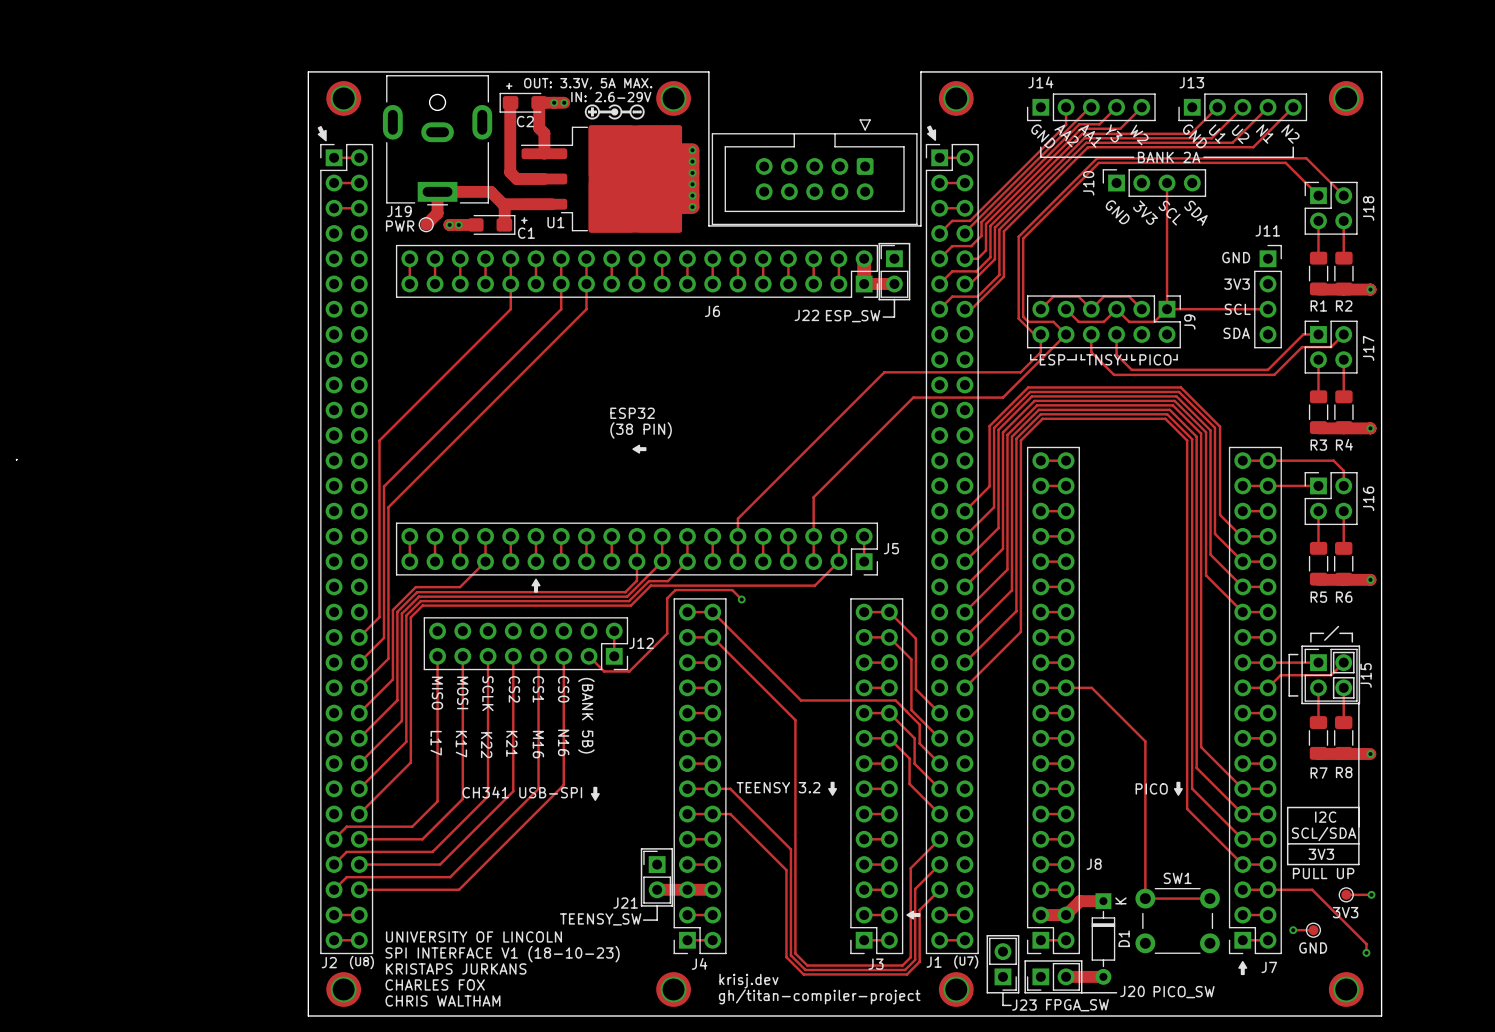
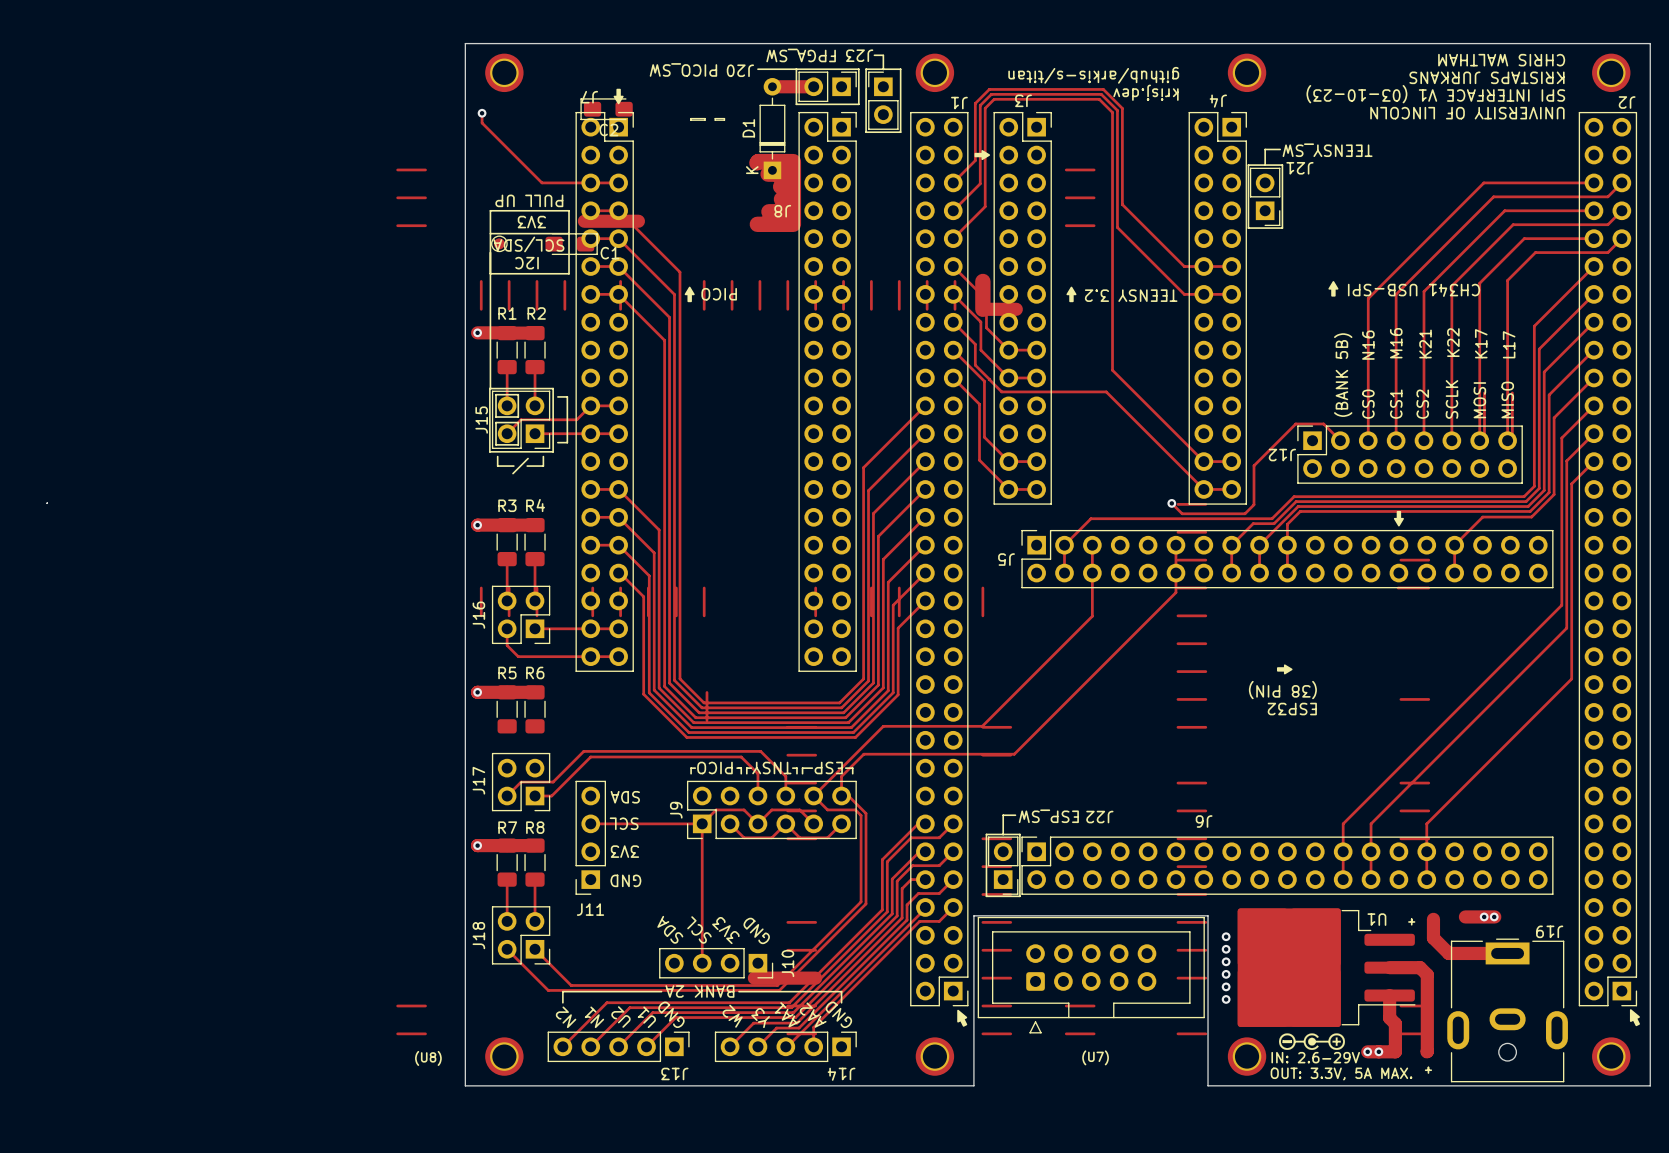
line: none -> (874, 55) (883, 55)
text: none -> FPGA_SW (801, 55)
line: none -> (883, 55) (883, 69)
text: none -> CHRIS WALTHAM (1501, 60)
line: none -> (757, 69) (858, 69) (858, 104) (796, 104) (796, 69)
line: none -> (866, 69) (900, 69) (900, 132) (866, 132) (866, 69)
text: none -> PICO_SW (683, 69)
part: none -> (934, 72)
part: none -> (1247, 72)
board edge: (308, 71) (708, 71) (708, 225) (920, 225) (920, 71) (1381, 71) (1381, 1016) (308, 1016) (308, 71) -> (465, 43) (465, 1085) (973, 1085) (973, 915) (1208, 915) (1208, 1085) (1650, 1085) (1650, 43) (465, 43)
text: none -> github/arkis-s/titan (1093, 75)
text: none -> KRISTAPS JURKANS (1487, 77)
track: none -> (772, 86) (813, 86)
line: (509, 83) (509, 88) -> none
text: OUT: 3.3V, 5A MAX. (588, 83) -> none
drawing: none -> [613, 88, 624, 105]
line: (506, 86) (511, 86) -> none
text: none -> krisj.dev (1145, 92)
text: none -> SPI INTERFACE V1 (03-10-23) (1435, 94)
text: IN: 2.6-29V (611, 97) -> none
part position: (343, 98) -> (504, 72)
part: (673, 98) -> none
part: (956, 98) -> none
part position: (1346, 98) -> (1611, 72)
track: (510, 102) (510, 172) (516, 178) (544, 178) -> none
via: (554, 102) -> none
track: (564, 102) (539, 102) (539, 128) (544, 133) (544, 153) -> none
via: (564, 102) -> none
drawing: [584, 104, 645, 120] -> none
track: none -> (482, 113) (482, 123) (541, 182) (618, 182)
via: none -> (482, 113)
text: none -> UNIVERSITY OF LINCOLN (1467, 113)
track: (1066, 107) (1066, 124) (970, 220) (952, 220) (939, 233) -> none
track: (1091, 107) (964, 233) -> none
J14 rotation: 0° (1091, 107) -> 180° (785, 1046)
J14 position: (1091, 107) -> (785, 1046)
track: (1116, 107) (1099, 124) (1079, 124) (981, 222) (981, 235) (971, 246) (952, 246) (939, 258) -> none
track: (1141, 107) (1120, 128) (1081, 128) (985, 223) (985, 250) (977, 258) (964, 258) -> none
track: (1217, 107) (1191, 133) (1082, 133) (990, 225) (990, 257) (976, 271) (952, 271) (939, 283) -> none
track: (1242, 107) (1211, 138) (1084, 138) (994, 227) (994, 259) (970, 283) (964, 283) -> none
J13 rotation: 0° (1242, 107) -> 180° (618, 1046)
J13 position: (1242, 107) -> (618, 1046)
track: (1268, 107) (1232, 142) (1086, 142) (999, 229) (999, 274) (977, 296) (952, 296) (939, 309) -> none
track: (1293, 107) (1253, 147) (1088, 147) (1003, 231) (1003, 276) (971, 309) (964, 309) -> none
line: (591, 108) (591, 115) (593, 115) (593, 108) (591, 108) -> none
line: (588, 111) (596, 111) (596, 112) (588, 112) (588, 111) -> none
line: (633, 111) (640, 111) (640, 112) (633, 112) (633, 111) -> none
drawing: [317, 125, 327, 142] -> none
drawing: [927, 125, 937, 141] -> none
text: Y3 (1114, 133) -> none
text: U1 (1217, 134) -> none
text: U2 (1240, 134) -> none
text: N1 (1264, 134) -> none
text: N2 (1290, 134) -> none
text: W2 (1139, 135) -> none
text: GND (1043, 136) -> none
text: AA2 (1066, 136) -> none
text: AA1 (1089, 136) -> none
text: GND (1194, 136) -> none
drawing: none -> [974, 150, 991, 161]
line: none -> (1280, 149) (1265, 149) (1265, 165)
text: none -> TEENSY_SW (1327, 150)
J19 rotation: 0° (437, 140) -> 180° (1507, 1010)
J19 position: (437, 140) -> (1507, 1010)
line: (1040, 147) (1040, 157) (1133, 157) -> none
line: (1293, 147) (1293, 157) (1203, 157) -> none
via: (692, 150) -> none
line: none -> (1248, 165) (1248, 228) (1282, 228) (1282, 165) (1248, 165)
text: BANK 2A (1169, 157) -> none
via: (692, 161) -> none
track: none -> (953, 182) (975, 160) (975, 103) (989, 89) (1103, 89) (1122, 108) (1122, 204) (1184, 266) (1231, 266)
track: none -> (1593, 182) (1483, 182) (1368, 298) (1368, 440)
track: none -> (1621, 182) (1607, 196) (1493, 196) (1396, 294) (1396, 440)
via: (692, 172) -> none
part: (814, 172) -> none
U1 rotation: 0° (601, 178) -> 180° (1326, 967)
U1 position: (601, 178) -> (1326, 967)
J10 rotation: 0° (1154, 183) -> 180° (716, 963)
J10 position: (1154, 183) -> (716, 963)
track: (1167, 183) (1167, 309) -> none
via: (692, 184) -> none
text: none -> PULL UP (529, 200)
track: none -> (590, 210) (618, 210) (680, 272) (680, 678) (704, 702) (839, 702) (863, 678) (863, 467) (925, 405)
track: none -> (953, 210) (980, 183) (980, 105) (991, 94) (1101, 94) (1117, 110) (1117, 227) (1184, 294) (1231, 294)
track: none -> (1593, 210) (1504, 210) (1423, 291) (1423, 440)
track: none -> (1621, 210) (1607, 224) (1513, 224) (1451, 286) (1451, 440)
via: (692, 195) -> none
track: (1318, 195) (1285, 162) (1098, 162) (1023, 238) (1023, 316) (1028, 321) (1053, 321) (1066, 334) (1002, 397) (913, 397) (813, 497) (813, 561) -> none
track: (1343, 195) (1306, 158) (1097, 158) (1018, 236) (1018, 318) (1034, 334) (1040, 334) (1040, 352) (1020, 372) (884, 372) (737, 518) (737, 561) -> none
text: none -> 3V3 (531, 222)
via: (692, 207) -> none
J18 rotation: 0° (1331, 208) -> 180° (521, 935)
J18 position: (1331, 208) -> (521, 935)
text: GND (1117, 212) -> none
text: 3V3 (1145, 212) -> none
text: SCL (1169, 213) -> none
text: SDA (1195, 213) -> none
line: none -> (490, 233) (569, 233)
line: (524, 217) (524, 222) -> none
track: none -> (590, 238) (618, 238) (674, 294) (674, 680) (701, 707) (841, 707) (868, 680) (868, 490) (925, 433)
line: (521, 220) (526, 220) -> none
track: none -> (953, 238) (985, 206) (985, 108) (994, 99) (1099, 99) (1112, 112) (1112, 370) (1203, 461) (1231, 461)
track: (1318, 220) (1318, 258) -> none
track: (1343, 220) (1343, 258) -> none
track: none -> (1593, 238) (1524, 238) (1479, 283) (1479, 440)
track: none -> (1621, 238) (1607, 252) (1535, 252) (1507, 280) (1507, 440)
track: (504, 222) (504, 205) (490, 191) (437, 191) (437, 213) (426, 224) -> none
track: (449, 224) (475, 224) -> none
via: (449, 224) -> none
via: (458, 224) -> none
text: none -> SCL/SDA (528, 244)
text: PWR (400, 226) -> none
text: none -> I2C (527, 263)
line: (879, 243) (879, 299) (909, 299) (909, 243) (879, 243) -> none
track: none -> (590, 266) (618, 266) (669, 317) (669, 683) (699, 712) (843, 712) (873, 683) (873, 513) (925, 461)
track: none -> (953, 266) (986, 299) (986, 327) (1008, 350) (1036, 350)
track: none -> (1593, 266) (1534, 326) (1534, 486) (1524, 496) (1294, 496) (1272, 518) (1090, 518) (1064, 545) (1064, 573)
line: none -> (490, 273) (569, 273) (569, 210) (490, 210) (490, 389)
text: GND (1236, 257) -> none
track: (510, 258) (510, 309) (379, 440) (379, 617) (359, 637) -> none
track: (561, 258) (561, 309) (383, 486) (383, 637) (359, 662) -> none
track: (586, 258) (586, 309) (388, 507) (388, 658) (359, 687) -> none
drawing: none -> [1328, 281, 1339, 297]
drawing: none -> [684, 286, 695, 303]
drawing: none -> [1066, 286, 1077, 303]
text: none -> CH341 USB-SPI (1414, 290)
track: none -> (590, 294) (618, 294) (664, 340) (664, 686) (695, 717) (845, 717) (878, 685) (878, 536) (925, 489)
text: none -> PICO (719, 294)
track: none -> (953, 294) (980, 322) (980, 350) (1008, 377) (1036, 377)
track: none -> (1593, 294) (1539, 349) (1539, 488) (1526, 501) (1296, 501) (1274, 523) (1253, 523) (1231, 545) (1231, 573)
J6 rotation: 0° (636, 271) -> 180° (1287, 865)
J6 position: (636, 271) -> (1287, 865)
J22 rotation: 0° (894, 271) -> 180° (1003, 865)
J22 position: (894, 271) -> (1003, 865)
text: none -> TEENSY 3.2 (1131, 295)
R1 position: (1318, 273) -> (507, 350)
R2 position: (1343, 273) -> (535, 350)
text: 3V3 (1237, 284) -> none
track: (1318, 289) (1370, 289) -> none
via: (1370, 289) -> none
track: none -> (953, 322) (975, 344) (975, 365) (1001, 391) (1106, 391) (1203, 489) (1231, 489)
track: none -> (1593, 322) (1544, 372) (1544, 490) (1528, 506) (1298, 506) (1259, 545) (1259, 573)
J11 rotation: 0° (1268, 296) -> 180° (590, 837)
J11 position: (1268, 296) -> (590, 837)
line: (894, 299) (894, 317) (883, 317) -> none
track: none -> (477, 332) (535, 333)
via: none -> (477, 332)
R1 name position: R1 (1318, 305) -> R1 (507, 313)
R2 name position: R2 (1344, 305) -> R2 (536, 313)
track: (1040, 309) (1053, 296) (1078, 296) (1091, 309) (1103, 296) (1129, 296) (1141, 309) -> none
track: (1066, 309) (1078, 321) (1103, 321) (1116, 309) (1129, 321) (1154, 321) (1167, 309) -> none
track: (1167, 309) (1268, 309) -> none
text: SCL (1237, 309) -> none
text: none -> M16 (1396, 343)
text: none -> K22 (1453, 342)
text: none -> K21 (1425, 343)
text: none -> K17 (1481, 343)
text: ESP_SW (853, 316) -> none
text: none -> L17 (1509, 344)
track: none -> (953, 350) (984, 381) (984, 437) (1008, 461) (1036, 461)
track: none -> (1593, 350) (1549, 394) (1549, 492) (1530, 511) (1300, 511) (1287, 524) (1287, 573)
J9 rotation: 0° (1103, 321) -> 180° (771, 809)
J9 position: (1103, 321) -> (771, 809)
text: SDA (1236, 333) -> N16 (1368, 345)
track: (1091, 334) (1091, 352) (1114, 374) (1274, 374) (1302, 347) (1331, 347) (1343, 334) -> none
track: (1116, 334) (1116, 354) (1131, 369) (1268, 369) (1303, 334) (1318, 334) -> none
track: none -> (507, 367) (507, 405)
track: none -> (535, 367) (535, 405)
text: none -> (BANK 5B) (1343, 375)
track: none -> (953, 377) (979, 404) (979, 460) (1008, 489) (1036, 489)
track: none -> (1593, 377) (1554, 417) (1554, 494) (1531, 517) (1482, 517) (1454, 545) (1454, 573)
J17 rotation: 0° (1331, 347) -> 180° (521, 782)
J17 position: (1331, 347) -> (521, 782)
line: (1030, 354) (1030, 359) (1037, 359) -> none
line: (1076, 354) (1076, 359) (1067, 359) -> none
line: (1081, 354) (1081, 359) (1085, 359) -> none
line: (1126, 354) (1126, 359) (1122, 359) -> none
line: (1131, 354) (1131, 359) (1135, 359) -> none
line: (1177, 354) (1177, 359) (1173, 359) -> none
line: none -> (489, 388) (553, 388) (553, 451) (489, 451) (489, 388)
text: ESP (1052, 359) -> none
text: TNSY (1103, 359) -> none
text: PICO (1155, 359) -> none
line: none -> (496, 394) (518, 394) (518, 417) (496, 417) (496, 394)
line: none -> (557, 396) (567, 396) (567, 442) (557, 442)
text: none -> SCLK (1452, 399)
text: none -> MOSI (1479, 400)
text: none -> MISO (1507, 399)
text: none -> CS0 (1368, 404)
text: none -> CS1 (1396, 404)
text: none -> CS2 (1422, 404)
track: none -> (618, 405) (590, 405) (576, 419) (521, 419) (507, 433)
track: none -> (1593, 405) (1561, 438) (1561, 605) (1343, 823) (1343, 879)
line: none -> (496, 422) (496, 444) (518, 444) (518, 422) (496, 422)
track: none -> (535, 433) (618, 433)
track: none -> (1593, 433) (1566, 460) (1566, 628) (1371, 823) (1371, 879)
track: none -> (1340, 440) (1323, 423) (1295, 423) (1254, 465) (1254, 504) (1245, 513) (1182, 513) (1171, 503)
R3 position: (1318, 412) -> (507, 542)
R4 position: (1343, 412) -> (535, 542)
text: ESP32 (632, 413) -> none
line: none -> (497, 456) (497, 466) (513, 466)
line: none -> (543, 456) (543, 466) (527, 466)
line: none -> (528, 458) (513, 473)
track: none -> (1593, 461) (1571, 483) (1571, 678) (1426, 823) (1426, 879)
track: (1318, 428) (1370, 428) -> none
via: (1370, 428) -> none
text: (38 PIN) (641, 430) -> none
drawing: [632, 444, 647, 454] -> none
R4 name position: R4 (1344, 444) -> R4 (535, 505)
R3 name position: R3 (1318, 445) -> R3 (507, 505)
track: none -> (590, 489) (618, 489) (659, 529) (659, 688) (693, 722) (848, 722) (883, 687) (883, 559) (925, 517)
via: none -> (1171, 503)
track: (1242, 460) (1333, 460) (1343, 470) (1343, 485) -> none
drawing: none -> [1393, 510, 1404, 527]
track: none -> (590, 517) (618, 517) (654, 552) (654, 690) (691, 727) (851, 727) (888, 690) (888, 582) (925, 545)
track: none -> (477, 525) (535, 525)
via: none -> (477, 525)
track: (1242, 485) (1318, 485) -> none
track: none -> (590, 545) (618, 545) (649, 575) (649, 692) (688, 732) (853, 732) (893, 692) (893, 605) (925, 573)
track: none -> (1092, 545) (1092, 616) (982, 726) (883, 726) (813, 796) (827, 809) (855, 809) (861, 815) (861, 901) (777, 985) (571, 985) (535, 949)
track: none -> (1175, 545) (1175, 592) (1014, 754) (863, 754) (841, 776) (841, 796) (848, 796) (866, 813) (866, 903) (779, 990) (548, 990) (507, 949)
J16 rotation: 0° (1331, 498) -> 180° (521, 614)
J16 position: (1331, 498) -> (521, 614)
track: none -> (507, 559) (507, 600)
track: none -> (535, 559) (535, 600)
track: (964, 511) (989, 486) (989, 426) (1028, 387) (1180, 387) (1220, 426) (1220, 514) (1241, 536) -> none
track: (1318, 511) (1318, 549) -> none
track: (1343, 511) (1343, 549) -> none
track: none -> (620, 573) (643, 596) (643, 694) (686, 737) (855, 737) (898, 694) (898, 628) (925, 600)
track: (485, 536) (485, 561) (460, 587) (415, 587) (392, 610) (392, 679) (359, 713) -> none
track: (636, 536) (636, 580) (625, 592) (417, 592) (397, 611) (397, 700) (359, 738) -> none
track: (662, 536) (662, 561) (627, 596) (418, 596) (401, 613) (401, 721) (359, 763) -> none
track: (687, 536) (687, 561) (667, 581) (649, 581) (629, 601) (420, 601) (406, 615) (406, 741) (359, 788) -> none
track: (838, 536) (838, 561) (814, 585) (650, 585) (630, 605) (422, 605) (410, 617) (410, 762) (359, 814) -> none
track: (964, 536) (994, 507) (994, 427) (1030, 391) (1179, 391) (1215, 427) (1215, 533) (1242, 561) (1268, 561) -> none
J2 rotation: 0° (346, 549) -> 180° (1607, 559)
J2 position: (346, 549) -> (1607, 559)
J5 rotation: 0° (636, 549) -> 180° (1287, 559)
J5 position: (636, 549) -> (1287, 559)
J1 rotation: 0° (952, 549) -> 180° (939, 559)
track: (964, 561) (998, 528) (998, 429) (1031, 396) (1176, 396) (1210, 430) (1210, 554) (1242, 586) (1268, 586) -> none
R5 position: (1318, 563) -> (507, 709)
R6 position: (1343, 563) -> (535, 709)
track: none -> (507, 628) (507, 645) (518, 656) (618, 656)
track: none -> (535, 628) (618, 628)
drawing: [531, 578, 541, 593] -> none
track: (1318, 579) (1370, 579) -> none
via: (1370, 579) -> none
track: (964, 586) (1003, 548) (1003, 432) (1034, 400) (1174, 400) (1206, 432) (1206, 575) (1242, 612) (1268, 612) -> none
R5 name position: R5 (1318, 597) -> R5 (507, 672)
R6 name position: R6 (1344, 597) -> R6 (535, 672)
track: (741, 599) (732, 590) (675, 590) (667, 598) (667, 633) (629, 671) (604, 671) (589, 656) -> none
via: (741, 599) -> none
drawing: none -> [1276, 664, 1293, 675]
track: (687, 612) (712, 612) (801, 700) (895, 700) (919, 724) (919, 743) (939, 763) -> none
track: (864, 612) (889, 612) (915, 638) (915, 689) (939, 713) -> none
track: (964, 612) (1007, 569) (1007, 434) (1037, 405) (1172, 405) (1201, 433) (1201, 747) (1242, 788) (1268, 788) -> none
line: (1338, 626) (1324, 640) -> none
text: none -> (38 PIN) (1282, 690)
track: none -> (477, 692) (535, 692)
via: none -> (477, 692)
line: (1323, 633) (1310, 633) (1310, 641) -> none
line: (1339, 633) (1352, 633) (1352, 641) -> none
track: (687, 637) (712, 637) (795, 720) (795, 953) (807, 965) (902, 965) (910, 957) (910, 868) (939, 839) -> none
track: (864, 637) (889, 637) (911, 659) (911, 710) (939, 738) -> none
track: (964, 637) (1011, 590) (1011, 436) (1038, 409) (1169, 409) (1196, 436) (1196, 767) (1242, 814) (1268, 814) -> none
J12 rotation: 0° (525, 643) -> 180° (1410, 454)
J12 position: (525, 643) -> (1410, 454)
text: none -> ESP32 (1292, 709)
line: (1302, 646) (1359, 646) (1359, 703) (1302, 703) (1302, 646) -> none
line: (1333, 652) (1333, 672) (1353, 672) (1353, 652) (1333, 652) -> none
line: (1297, 654) (1289, 654) (1289, 695) (1297, 695) -> none
track: (437, 656) (437, 801) (412, 826) (346, 826) (334, 839) -> none
track: (462, 656) (462, 798) (422, 839) (359, 839) -> none
track: (488, 656) (488, 796) (432, 851) (346, 851) (334, 864) -> none
track: (513, 656) (513, 791) (440, 864) (359, 864) -> none
track: (538, 656) (538, 788) (450, 877) (346, 877) (334, 889) -> none
track: (563, 656) (563, 785) (459, 889) (359, 889) -> none
track: (964, 662) (1016, 611) (1016, 438) (1040, 414) (1167, 414) (1192, 439) (1192, 788) (1242, 839) (1268, 839) -> none
track: (1242, 662) (1318, 662) -> none
track: (1343, 662) (1331, 675) (1280, 675) (1268, 687) (1242, 687) -> none
J15 rotation: 0° (1331, 675) -> 180° (521, 419)
J15 position: (1331, 675) -> (521, 419)
line: (1333, 677) (1353, 677) (1353, 697) (1333, 697) (1333, 677) -> none
track: (964, 687) (1020, 631) (1020, 440) (1042, 418) (1165, 418) (1187, 440) (1187, 808) (1242, 864) (1268, 864) -> none
track: (1040, 687) (1091, 687) (1145, 741) (1145, 898) (1209, 898) -> none
track: (1318, 687) (1318, 722) -> none
track: (1343, 687) (1343, 722) -> none
text: CS2 (514, 689) -> none
text: CS1 (538, 689) -> none
text: CS0 (563, 689) -> none
text: MOSI (462, 692) -> none
text: MISO (437, 693) -> none
text: SCLK (487, 693) -> none
line: none -> (695, 768) (691, 768) (691, 773)
text: none -> PICO (714, 768)
line: none -> (737, 768) (741, 768) (741, 773)
line: none -> (751, 768) (746, 768) (746, 773)
text: none -> TNSY (771, 768)
line: none -> (792, 768) (796, 768) (796, 773)
line: none -> (812, 768) (802, 768) (802, 773)
text: none -> ESP (828, 768)
line: none -> (845, 768) (852, 768) (852, 773)
J8 rotation: 0° (1053, 700) -> 180° (827, 391)
J8 position: (1053, 700) -> (827, 391)
J7 rotation: 0° (1255, 700) -> 180° (604, 391)
J7 position: (1255, 700) -> (604, 391)
line: (1358, 703) (1358, 864) (1287, 864) (1287, 807) (1358, 807) -> none
track: (864, 713) (889, 713) (914, 738) (914, 763) (939, 788) -> none
text: (BANK 5B) (586, 715) -> none
track: none -> (507, 796) (521, 782) (553, 782) (583, 751) (760, 751) (785, 776) (785, 796)
track: none -> (535, 796) (551, 796) (590, 756) (741, 756) (757, 773) (757, 796)
R7 position: (1318, 737) -> (507, 862)
R8 position: (1343, 737) -> (535, 862)
track: (864, 738) (889, 738) (909, 758) (909, 783) (939, 814) -> none
text: N16 (563, 742) -> SDA (625, 797)
line: none -> (1015, 815) (1003, 815) (1003, 834)
text: L17 (436, 743) -> none
text: K21 (511, 743) -> none
text: none -> ESP_SW (1048, 816)
text: K17 (461, 744) -> none
text: M16 (538, 744) -> none
text: K22 (486, 745) -> none
text: none -> SCL (624, 823)
track: none -> (590, 823) (702, 823)
track: none -> (702, 823) (702, 963)
track: none -> (702, 823) (716, 809) (744, 809) (757, 823) (771, 809) (799, 809) (813, 823)
track: none -> (730, 823) (744, 837) (771, 837) (785, 823) (799, 837) (827, 837) (841, 823)
track: none -> (925, 823) (918, 823) (882, 859) (882, 909) (789, 1002) (606, 1002) (562, 1046)
track: none -> (953, 823) (939, 837) (911, 837) (887, 861) (887, 911) (791, 1007) (629, 1007) (590, 1046)
track: (1318, 753) (1370, 753) -> none
via: (1370, 753) -> none
line: none -> (986, 834) (1019, 834) (1019, 896) (986, 896) (986, 834)
track: none -> (477, 845) (535, 845)
via: none -> (477, 845)
R8 name position: R8 (1344, 772) -> R8 (535, 827)
R7 name position: R7 (1319, 773) -> R7 (507, 827)
text: none -> 3V3 (624, 851)
track: none -> (925, 851) (919, 851) (892, 879) (892, 913) (793, 1012) (652, 1012) (618, 1046)
track: none -> (953, 851) (939, 865) (912, 865) (897, 881) (897, 915) (795, 1017) (675, 1017) (646, 1046)
J4 rotation: 0° (700, 776) -> 180° (1217, 308)
J4 position: (700, 776) -> (1217, 308)
J3 rotation: 0° (876, 776) -> 180° (1022, 308)
J3 position: (876, 776) -> (1022, 308)
drawing: [828, 781, 838, 796] -> none
drawing: [1173, 781, 1183, 796] -> none
drawing: [590, 786, 600, 801] -> none
text: TEENSY 3.2 (778, 787) -> none
track: (687, 788) (730, 788) (790, 849) (790, 955) (805, 969) (905, 969) (915, 959) (915, 889) (939, 864) -> none
text: PICO (1151, 788) -> none
text: CH341 USB-SPI (522, 792) -> none
track: none -> (507, 879) (507, 921)
track: none -> (535, 879) (535, 921)
track: none -> (925, 879) (911, 879) (902, 888) (902, 918) (796, 1023) (753, 1023) (730, 1046)
track: none -> (953, 879) (939, 893) (918, 893) (907, 904) (907, 920) (799, 1028) (776, 1028) (757, 1046)
text: none -> GND (625, 880)
track: (687, 814) (730, 814) (786, 870) (786, 957) (803, 974) (906, 974) (919, 961) (919, 909) (939, 889) -> none
text: I2C (1325, 817) -> none
track: none -> (925, 907) (785, 1046)
track: none -> (953, 907) (939, 921) (919, 921) (813, 1027) (813, 1046)
track: none -> (1465, 916) (1494, 916)
via: none -> (1484, 916)
text: SCL/SDA (1324, 834) -> none
via: none -> (1494, 916)
line: none -> (1411, 919) (1411, 924)
track: none -> (1433, 919) (1433, 938) (1448, 953) (1507, 953)
line: none -> (1408, 921) (1414, 921)
line: (1287, 843) (1358, 843) -> none
text: none -> SDA (670, 929)
text: none -> SCL (699, 929)
text: none -> 3V3 (725, 930)
text: none -> GND (756, 930)
line: (641, 848) (672, 848) (672, 905) (641, 905) (641, 848) -> none
via: none -> (1226, 936)
text: 3V3 (1321, 854) -> none
via: none -> (1226, 949)
text: PULL UP (1323, 873) -> none
via: none -> (1226, 961)
J21 rotation: 0° (657, 877) -> 180° (1265, 196)
J21 position: (657, 877) -> (1265, 196)
track: none -> (1389, 967) (1420, 967) (1427, 974) (1426, 1051)
via: none -> (1226, 974)
part: none -> (1091, 975)
track: (1242, 889) (1312, 889) (1366, 944) (1366, 952) -> none
track: (1346, 894) (1371, 894) -> none
part: (1346, 894) -> none
via: (1371, 894) -> none
via: none -> (1226, 986)
text: none -> BANK 2A (699, 991)
track: (1103, 901) (1079, 901) (1066, 915) (1040, 915) -> none
line: none -> (661, 991) (562, 991) (562, 1002)
line: none -> (739, 991) (841, 991) (841, 1002)
line: (657, 905) (657, 920) (643, 920) -> none
track: none -> (1389, 995) (1389, 1018) (1395, 1023) (1395, 1051) (1367, 1051)
via: none -> (1226, 999)
drawing: [906, 910, 921, 920] -> none
text: 3V3 (1345, 912) -> none
drawing: none -> [1629, 1009, 1640, 1027]
drawing: none -> [957, 1009, 968, 1027]
text: TEENSY_SW (600, 919) -> none
SW1: (1177, 920) -> none
text: none -> GND (671, 1014)
text: none -> AA1 (787, 1014)
text: none -> AA2 (813, 1015)
text: none -> GND (838, 1014)
text: none -> W2 (732, 1016)
text: none -> N2 (566, 1017)
text: none -> N1 (594, 1017)
text: none -> U2 (620, 1017)
text: none -> U1 (646, 1017)
text: none -> Y3 (760, 1018)
track: (1293, 930) (1313, 930) -> none
via: (1293, 930) -> none
part: (1313, 930) -> none
line: (987, 935) (987, 992) (1018, 992) (1018, 935) (987, 935) -> none
text: UNIVERSITY OF LINCOLN (473, 936) -> none
D1 rotation: 0° (1103, 939) -> 180° (772, 128)
D1 position: (1103, 939) -> (772, 128)
drawing: none -> [1279, 1033, 1345, 1050]
line: none -> (1283, 1040) (1291, 1040) (1291, 1042) (1283, 1042) (1283, 1040)
text: GND (1313, 947) -> none
via: (1366, 952) -> none
text: SPI INTERFACE V1 (18-10-23) (502, 954) -> none
via: none -> (1367, 1051)
via: none -> (1378, 1051)
part: none -> (934, 1056)
part: none -> (1247, 1056)
drawing: [1238, 960, 1248, 976] -> none
text: none -> IN: 2.6-29V (1315, 1057)
J23 rotation: 0° (1002, 964) -> 180° (883, 100)
J23 position: (1002, 964) -> (883, 100)
text: KRISTAPS JURKANS (456, 968) -> none
line: none -> (1428, 1067) (1428, 1073)
line: none -> (1425, 1070) (1431, 1070)
J20 rotation: 0° (1053, 976) -> 180° (827, 86)
J20 position: (1053, 976) -> (827, 86)
track: (1066, 976) (1103, 976) -> none
text: none -> OUT: 3.3V, 5A MAX. (1341, 1073)
text: krisj.dev (748, 981) -> none
text: CHARLES FOX (435, 984) -> none
part position: (343, 989) -> (504, 1056)
part: (673, 989) -> none
part: (956, 989) -> none
part position: (1346, 989) -> (1611, 1056)
line: (1002, 992) (1002, 1005) -> none
line: (1081, 992) (1081, 960) (1025, 960) (1025, 992) (1116, 992) -> none
text: PICO_SW (1184, 992) -> none
text: gh/titan-compiler-project (819, 996) -> none
text: CHRIS WALTHAM (442, 1000) -> none
line: (1002, 1005) (1011, 1005) -> none
text: FPGA_SW (1077, 1005) -> none

